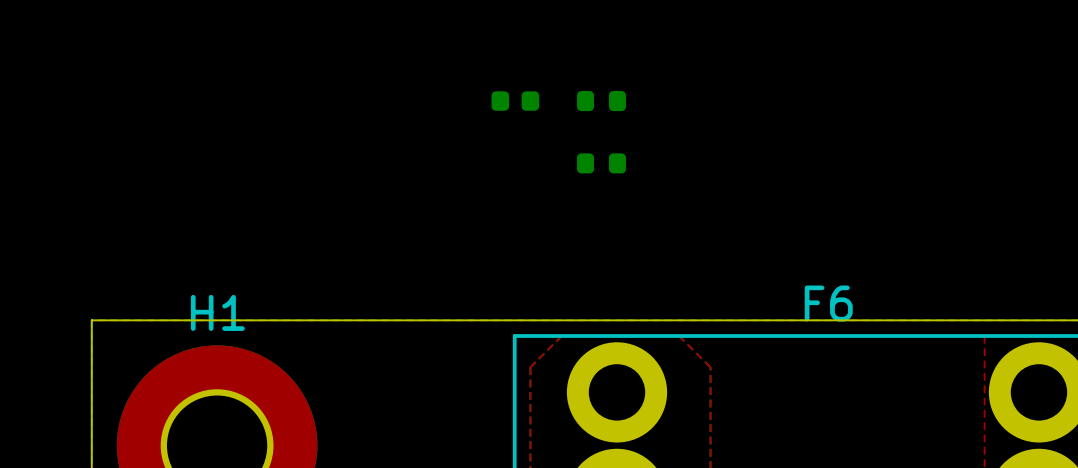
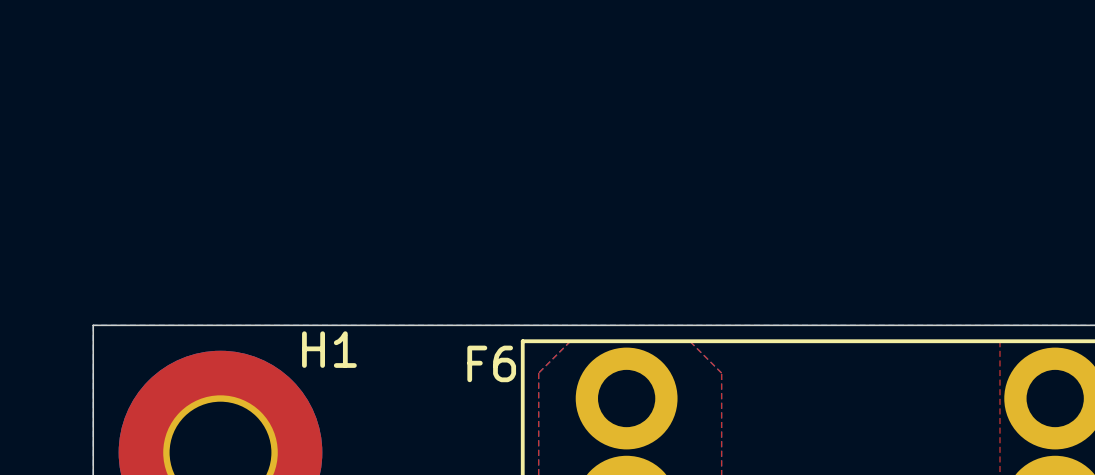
part: (515, 101) -> none
part: (601, 101) -> none
part: (601, 163) -> none
F6 name position: F6 (828, 303) -> F6 (491, 363)
H1 name position: H1 (217, 312) -> H1 (329, 349)

